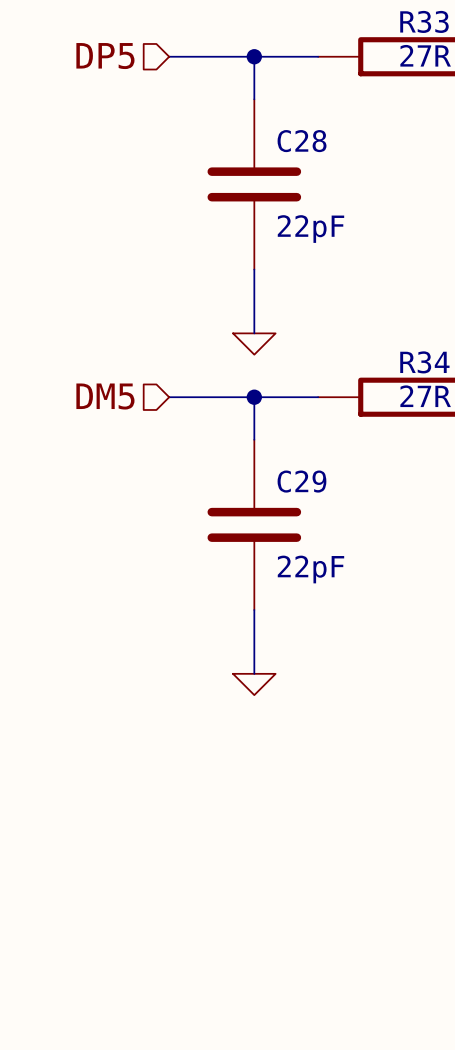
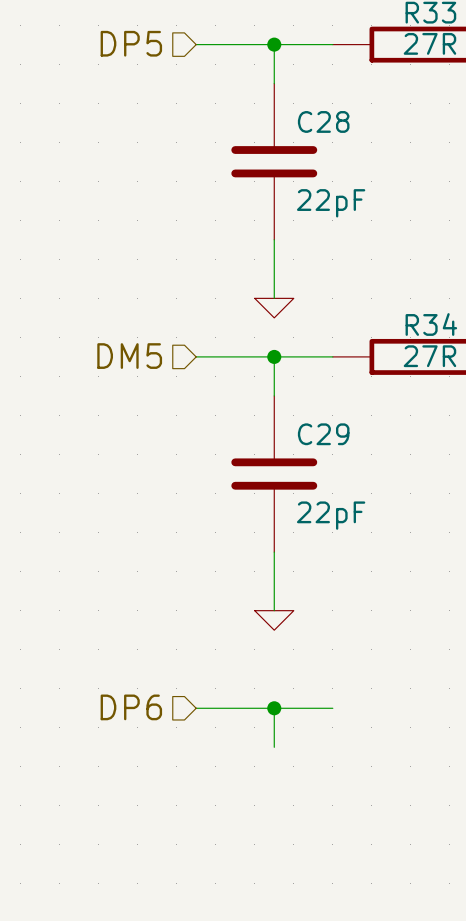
hierarchical label: none -> DP6 (131, 707)
wire: none -> (196, 708) (332, 708)
wire: none -> (274, 708) (274, 747)
junction: none -> (274, 708)

